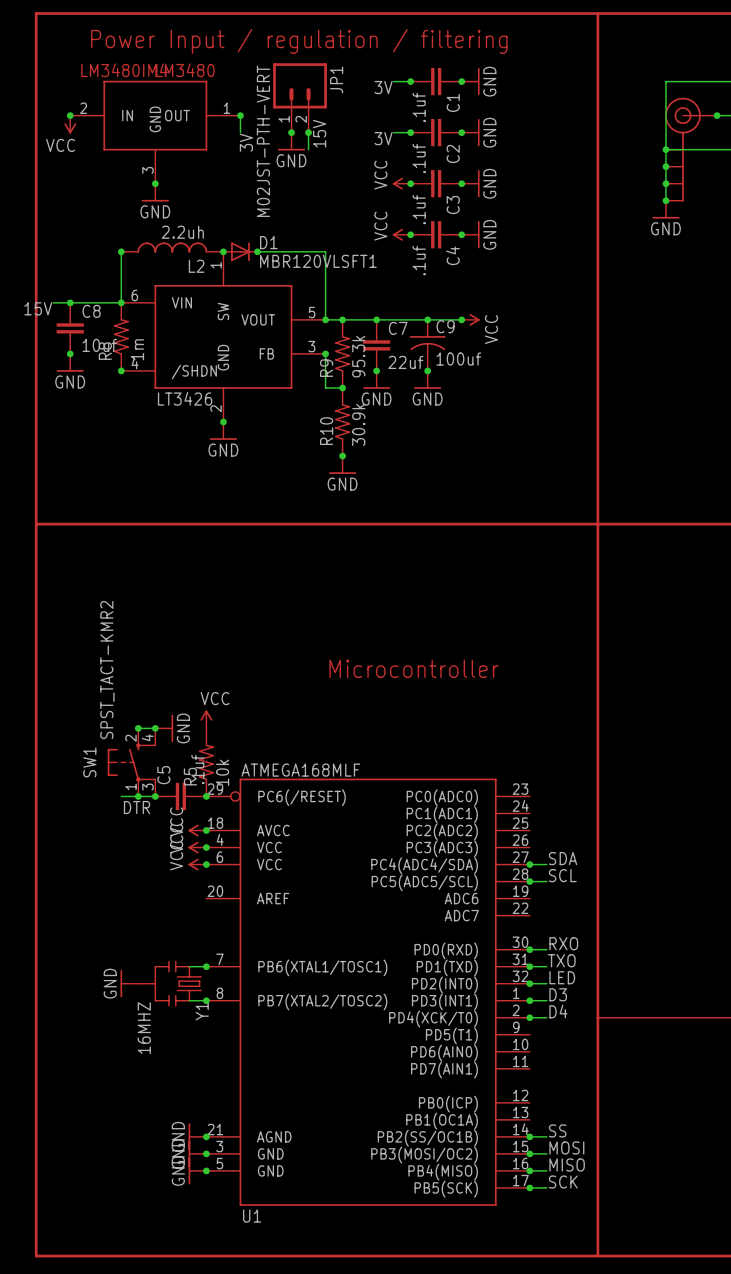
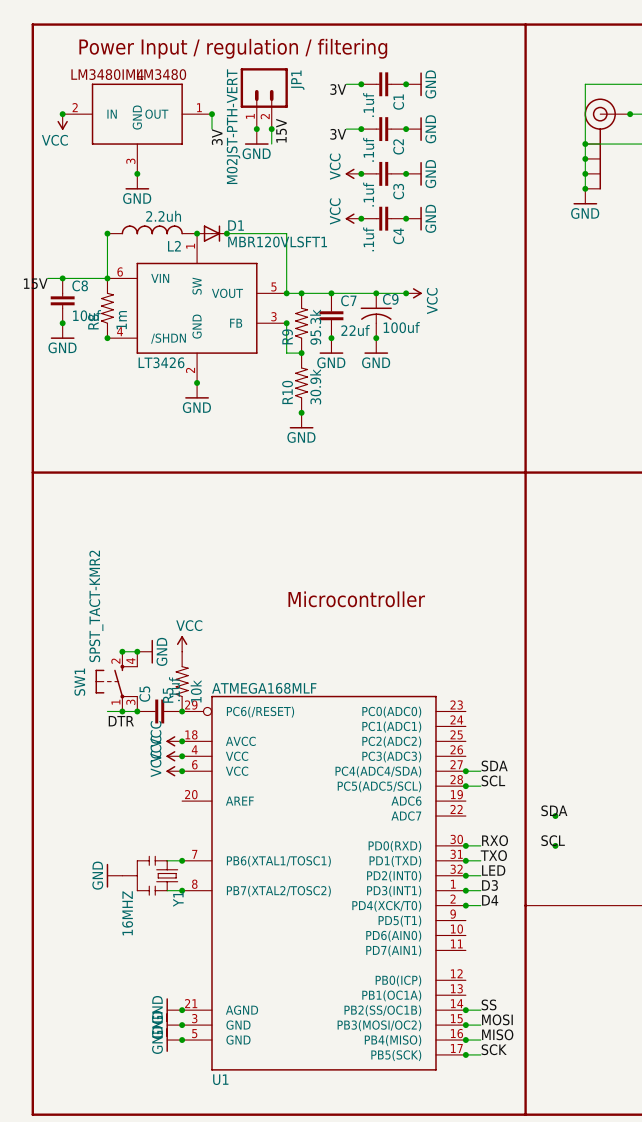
label: none -> SDA (554, 810)
junction: none -> (555, 816)
label: none -> SCL (553, 840)
junction: none -> (555, 845)

